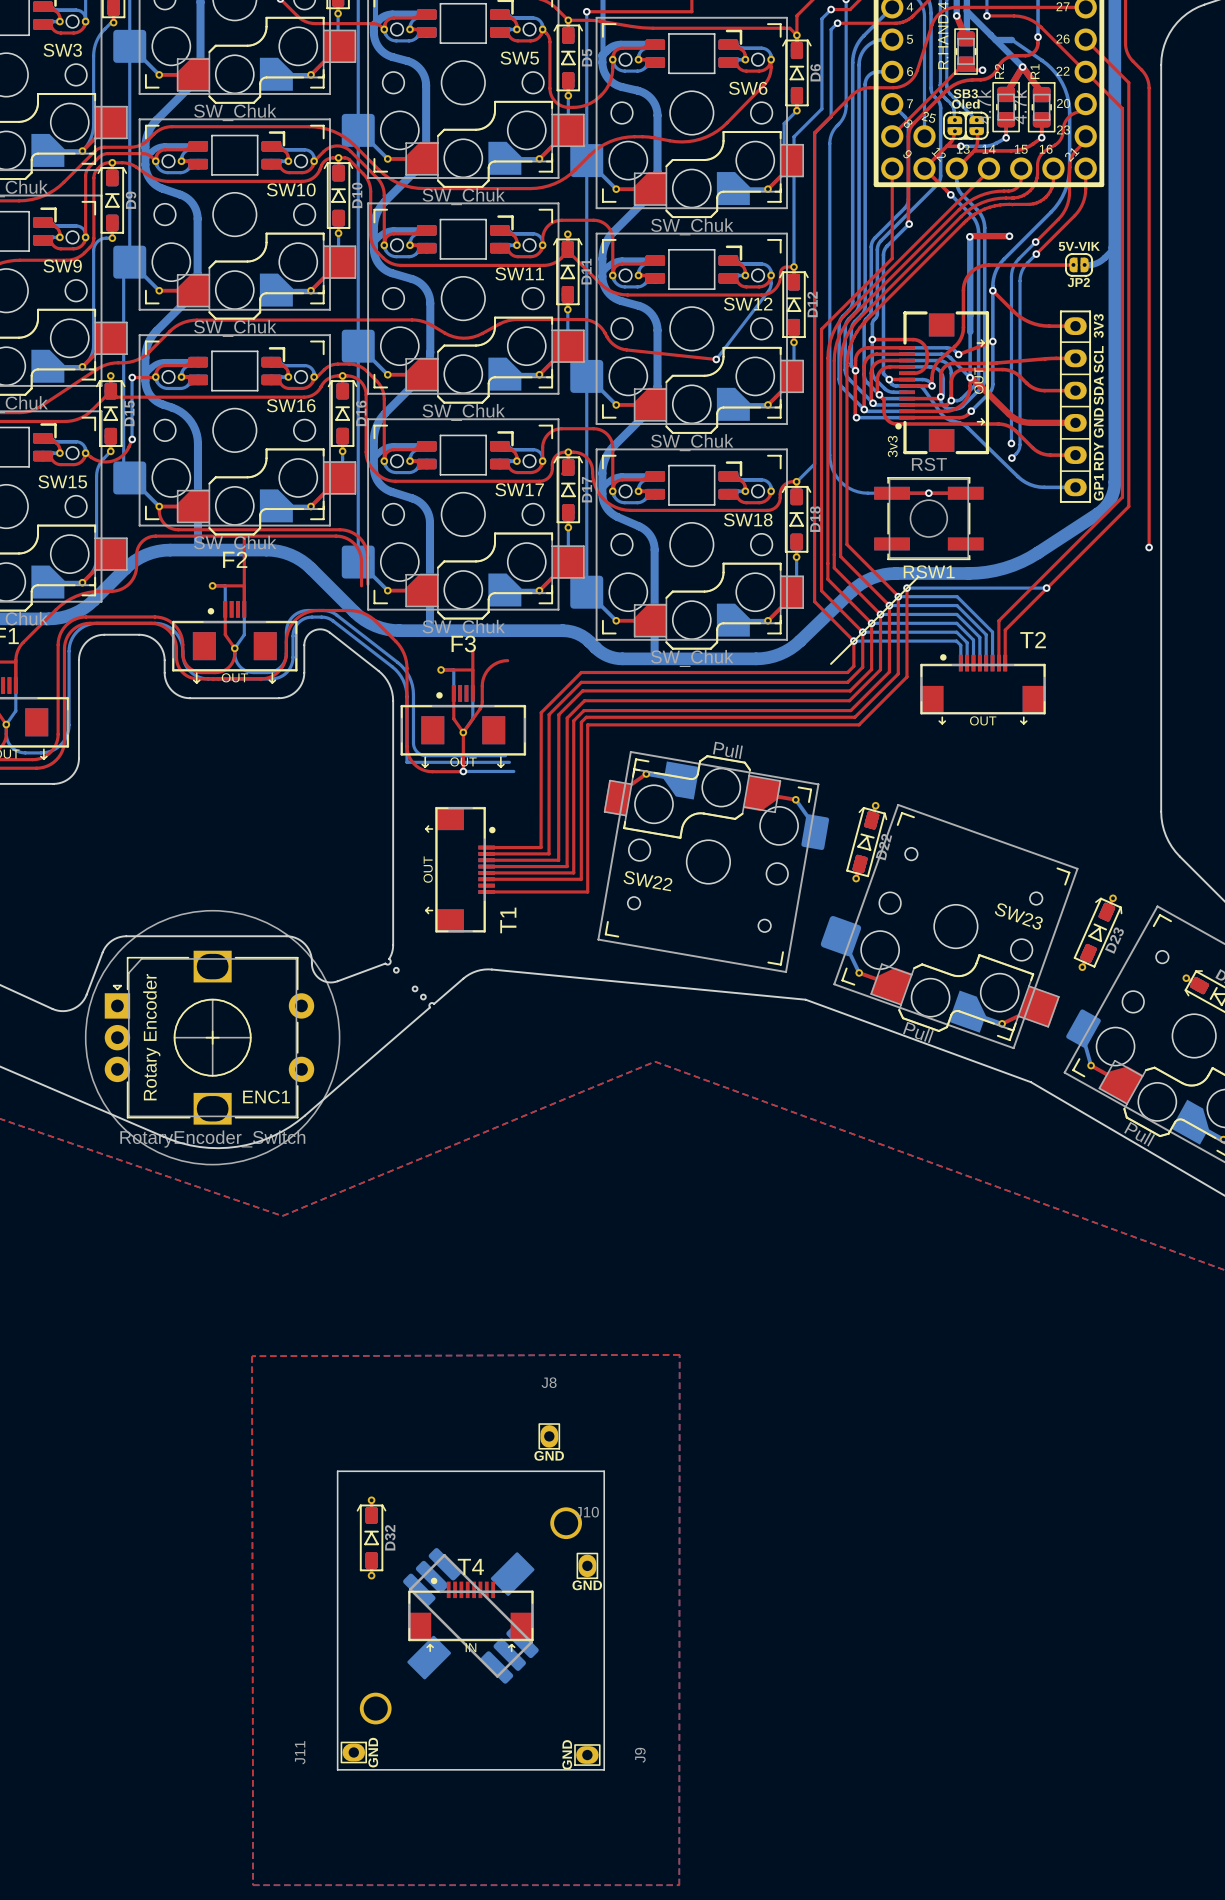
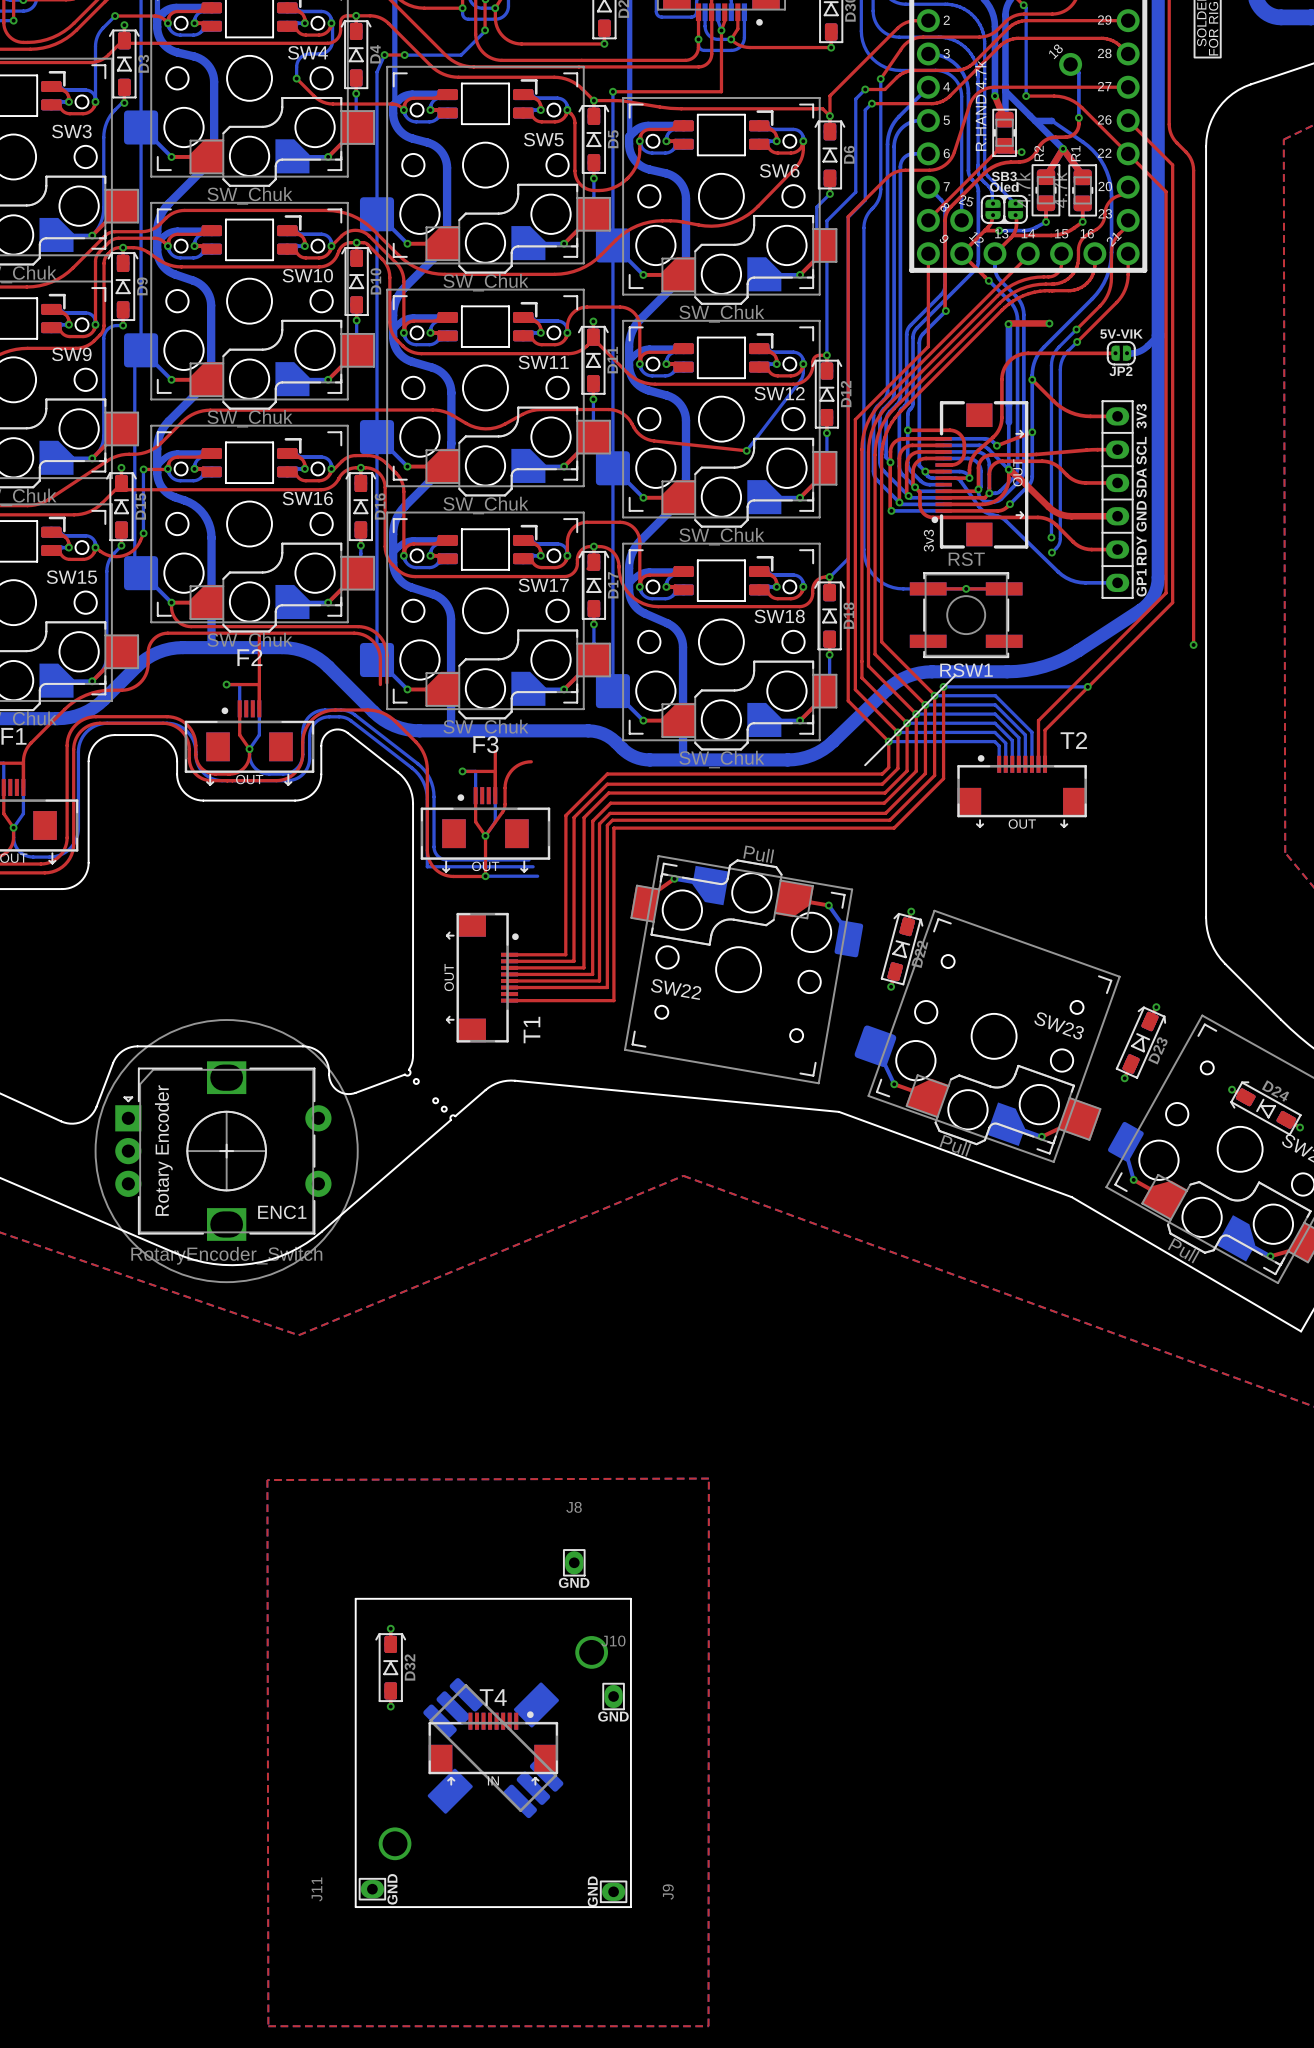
T4 footprint: [408, 1577, 534, 1652] -> [428, 1711, 559, 1786]

